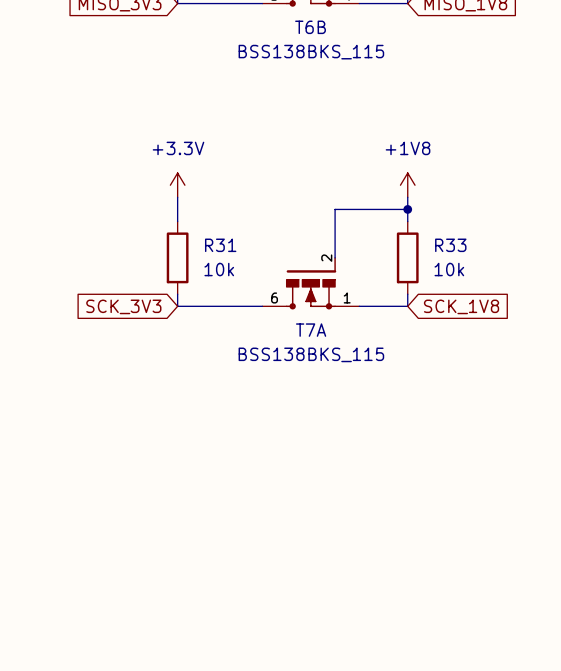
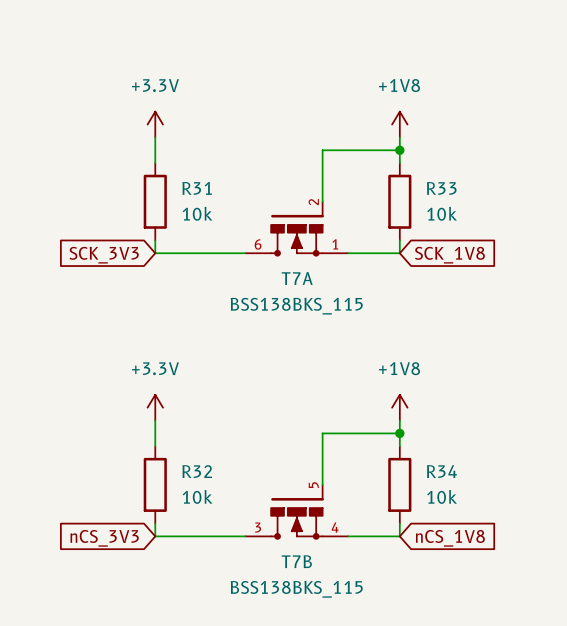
power symbol: none -> +3.3V (155, 407)
power symbol: none -> +1V8 (399, 407)
wire: none -> (155, 420) (155, 446)
wire: none -> (399, 420) (399, 446)
wire: none -> (399, 433) (322, 433) (322, 484)
junction: none -> (399, 433)
R32: none -> 10k (155, 484)
R34: none -> 10k (399, 484)
T7B: none -> BSS138BKS_115 (296, 511)
wire: none -> (155, 523) (155, 536) (245, 536)
wire: none -> (399, 523) (399, 536) (348, 536)
global label: none -> nCS_3V3 (104, 538)
global label: none -> nCS_1V8 (450, 538)

